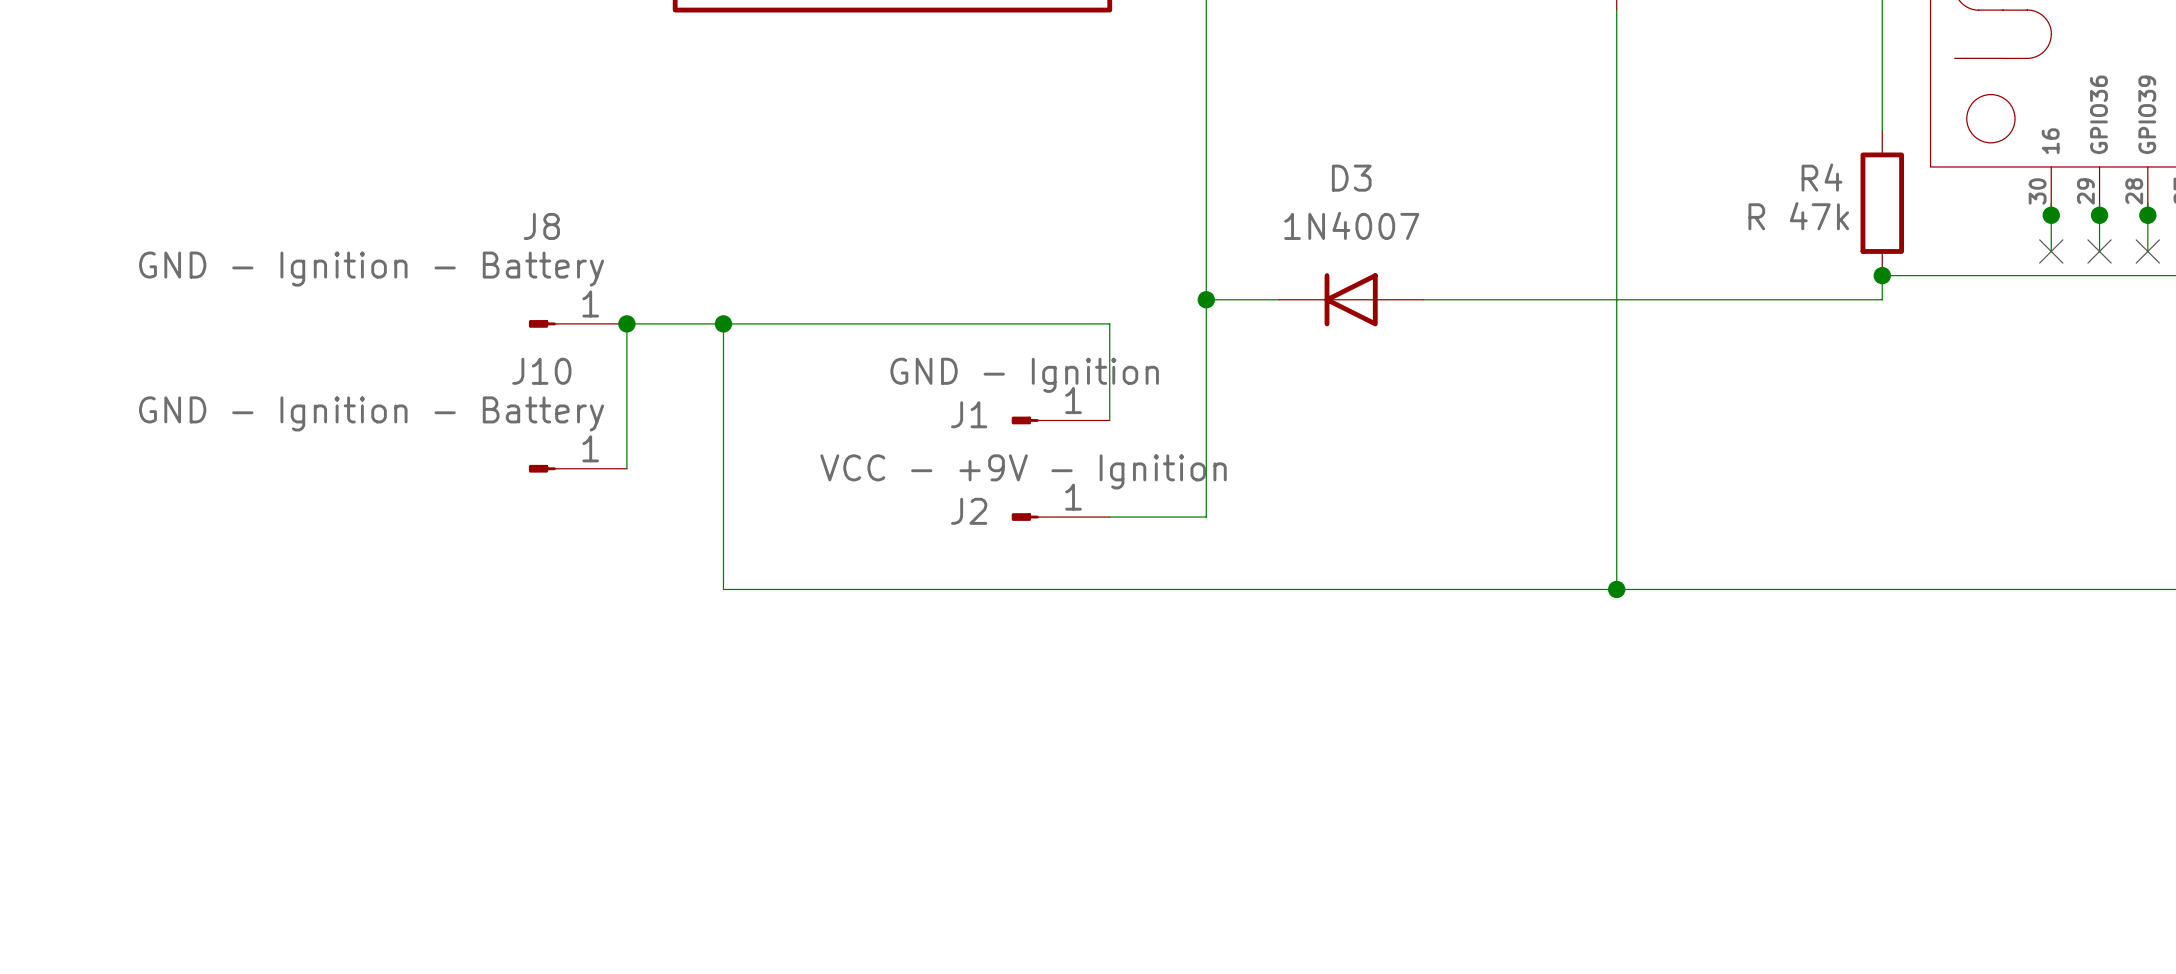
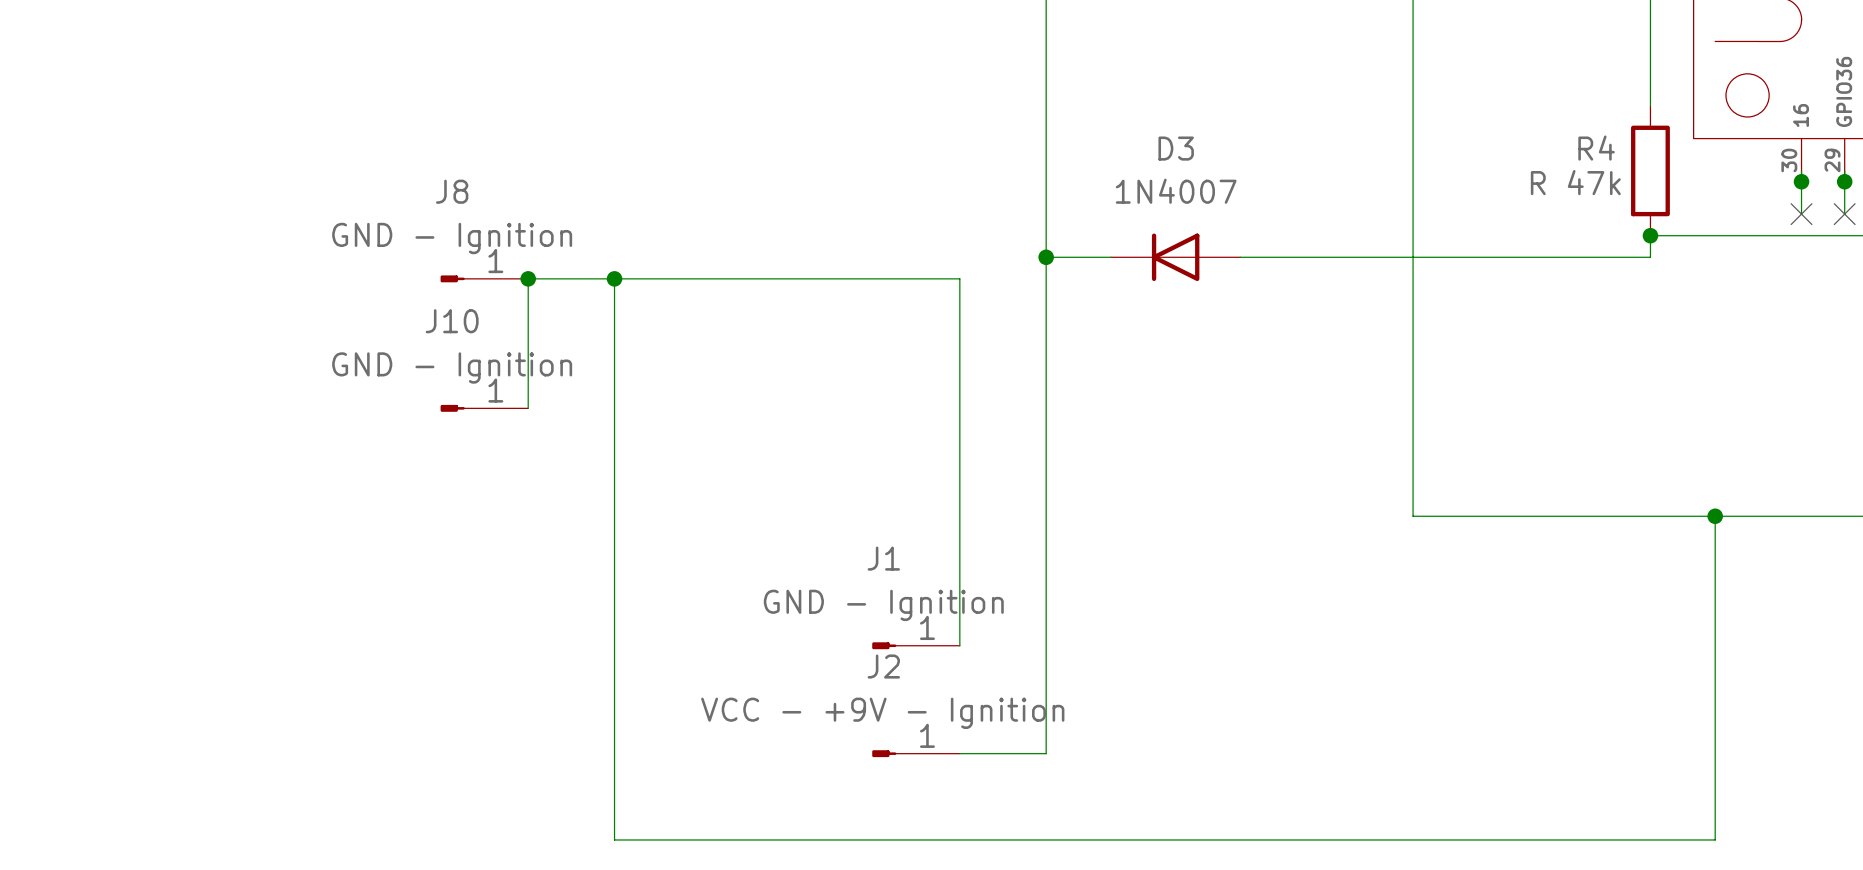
J8 value: GND - Ignition - Battery (371, 269) -> GND - Ignition (452, 238)
J10 value: GND - Ignition - Battery (371, 413) -> GND - Ignition (452, 367)
J1 name position: J1 (969, 414) -> J1 (883, 558)
J1 position: (1060, 420) -> (916, 645)
wire: none -> (959, 365) (959, 645)
J2 name position: J2 (969, 511) -> J2 (883, 666)
J2 position: (1060, 517) -> (916, 753)
wire: (1109, 517) (1206, 517) -> (959, 753) (1046, 753) (1046, 451)
wire: (723, 589) (1616, 589) -> (614, 516) (614, 839) (1715, 839) (1715, 516)
junction: (1616, 589) -> none
junction: none -> (1715, 516)

